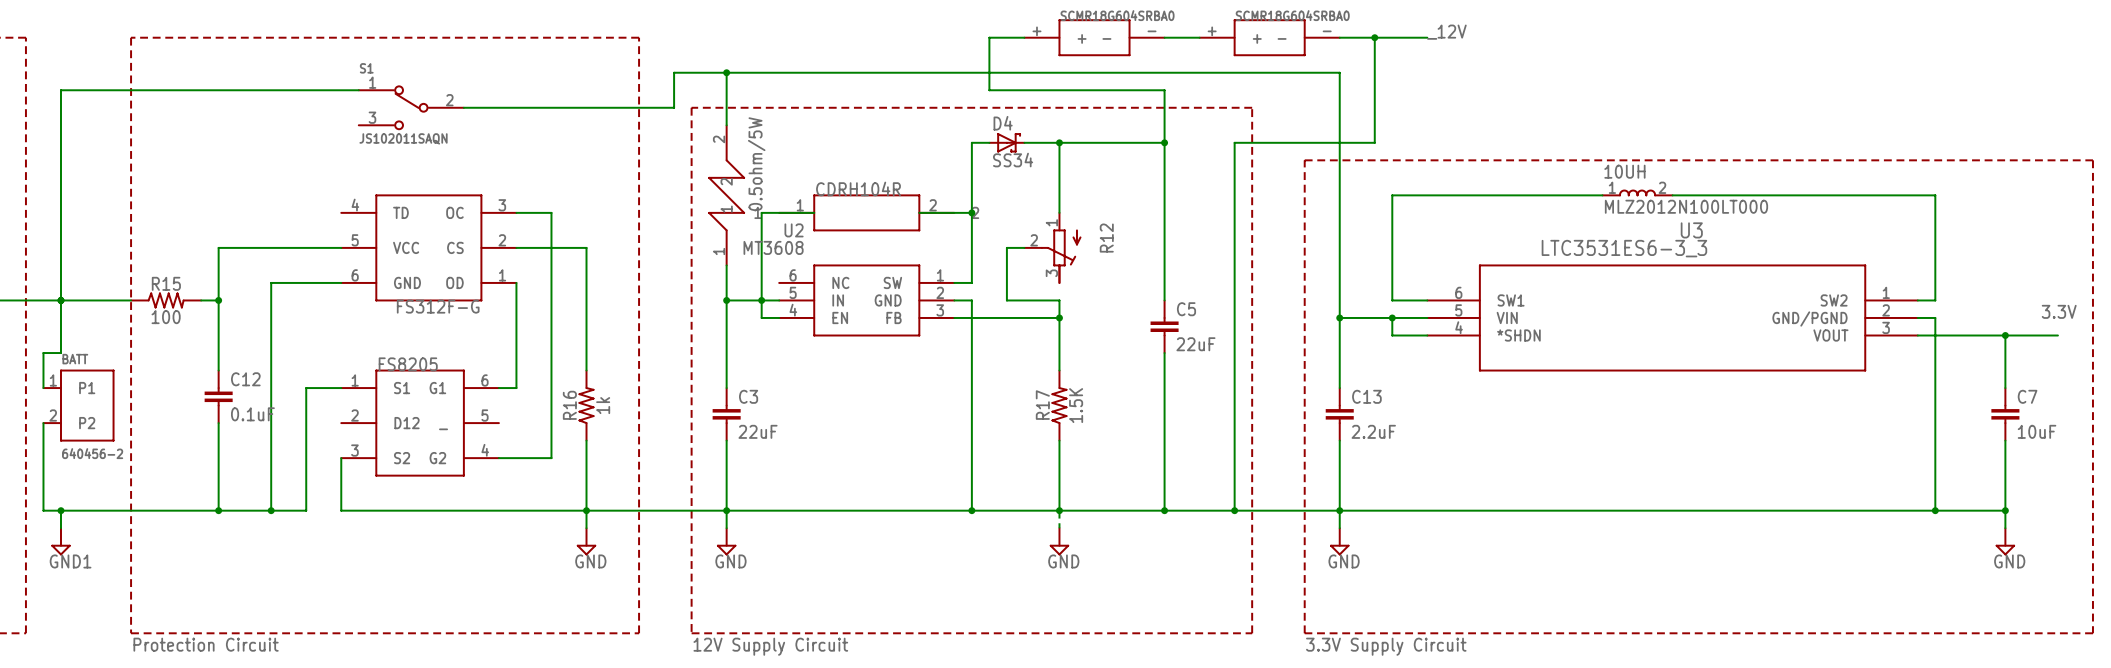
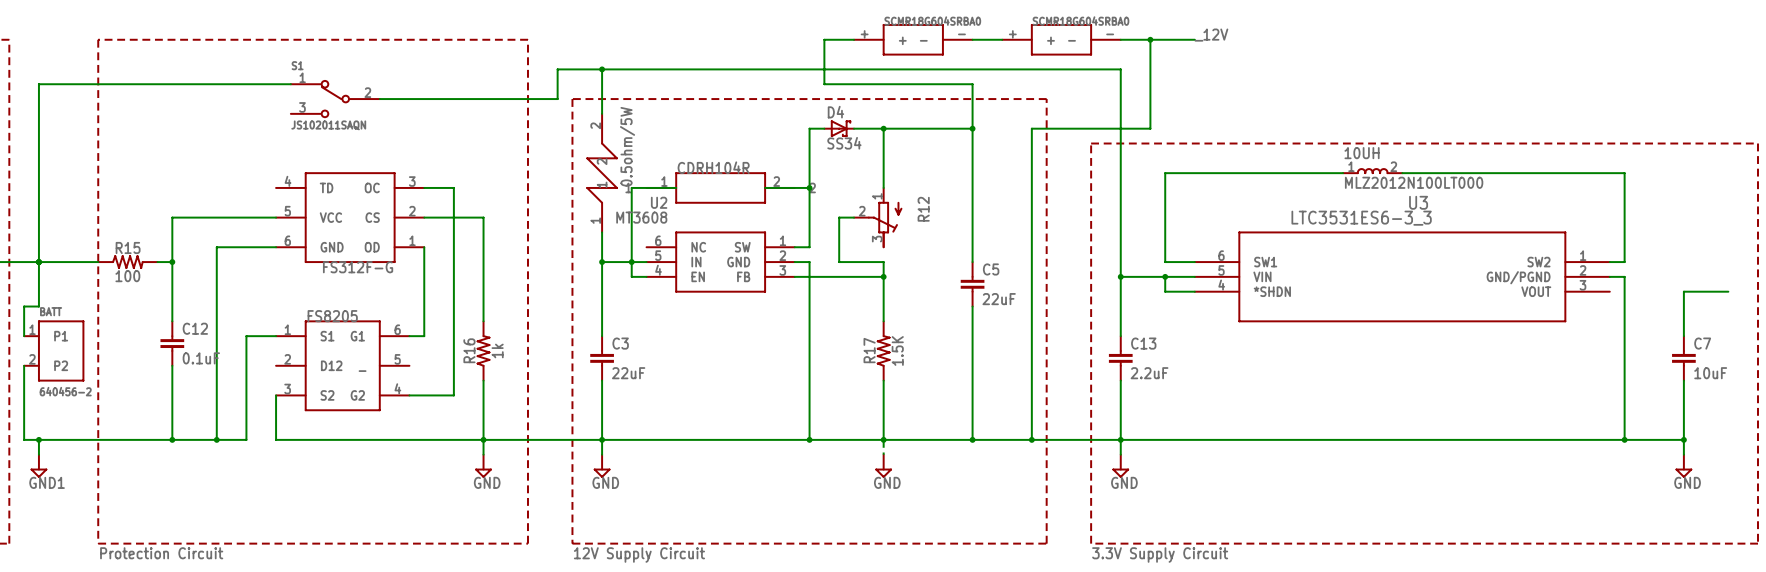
label: 3.3V (2059, 311) -> none
wire: (1917, 335) (2005, 335) -> none
junction: (2005, 335) -> none

